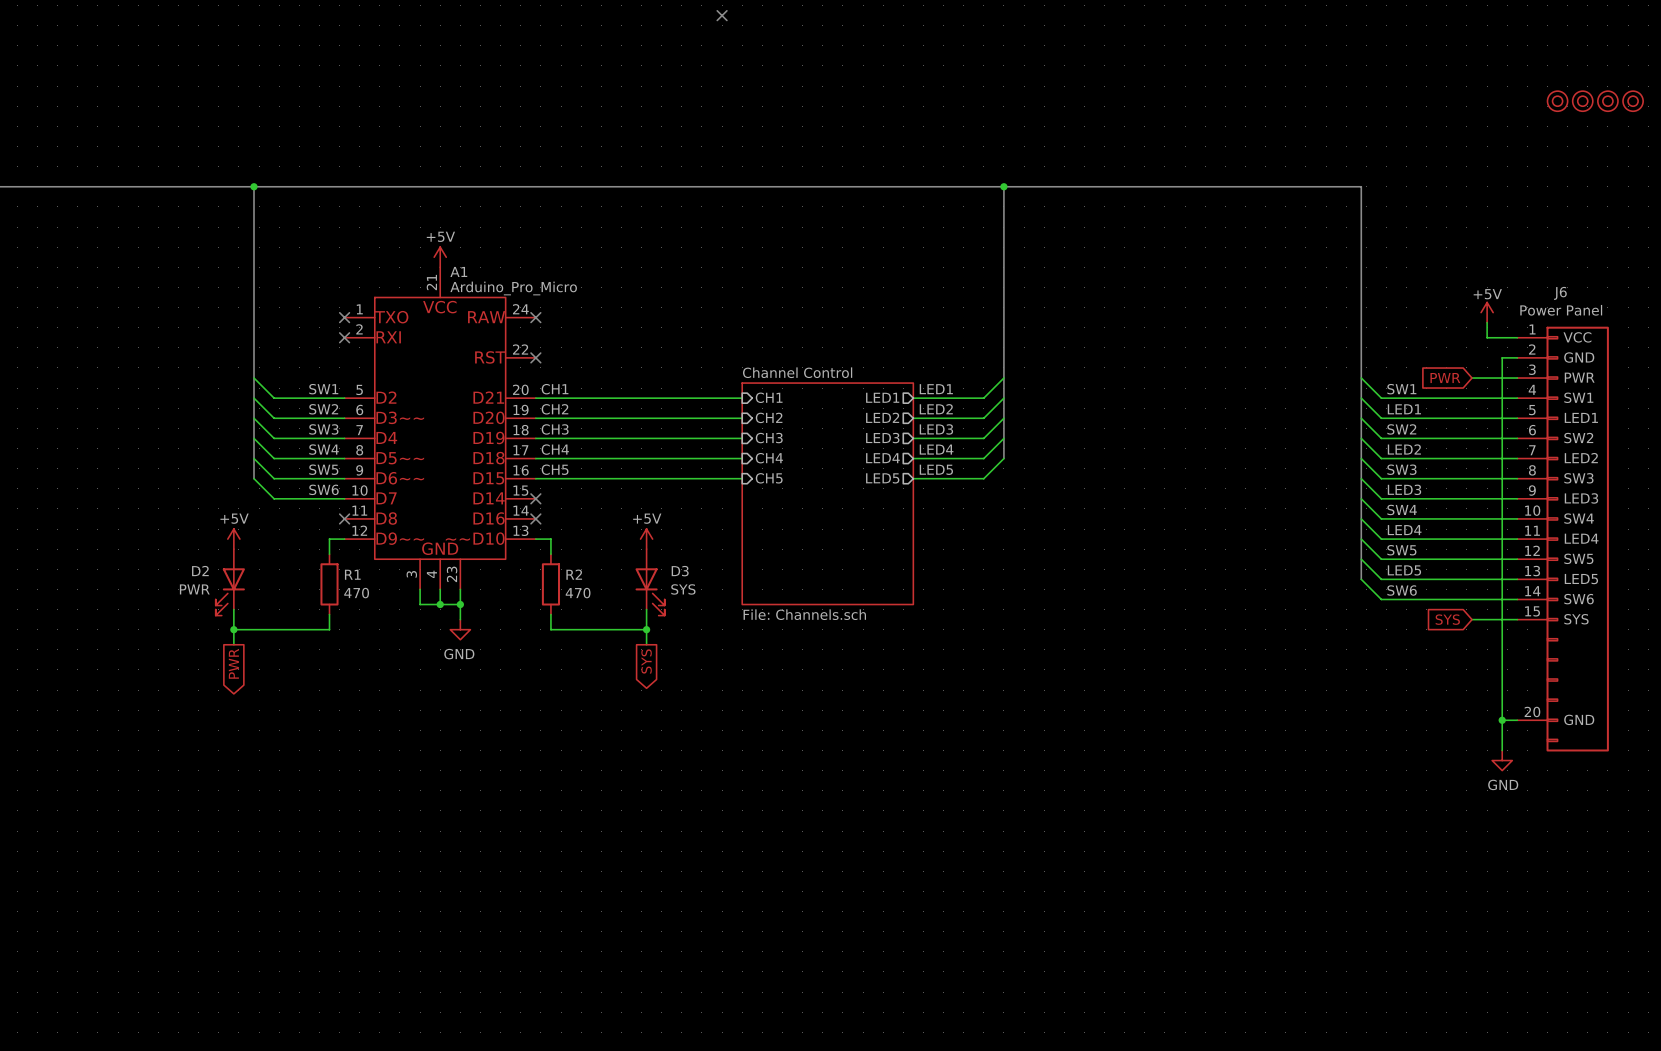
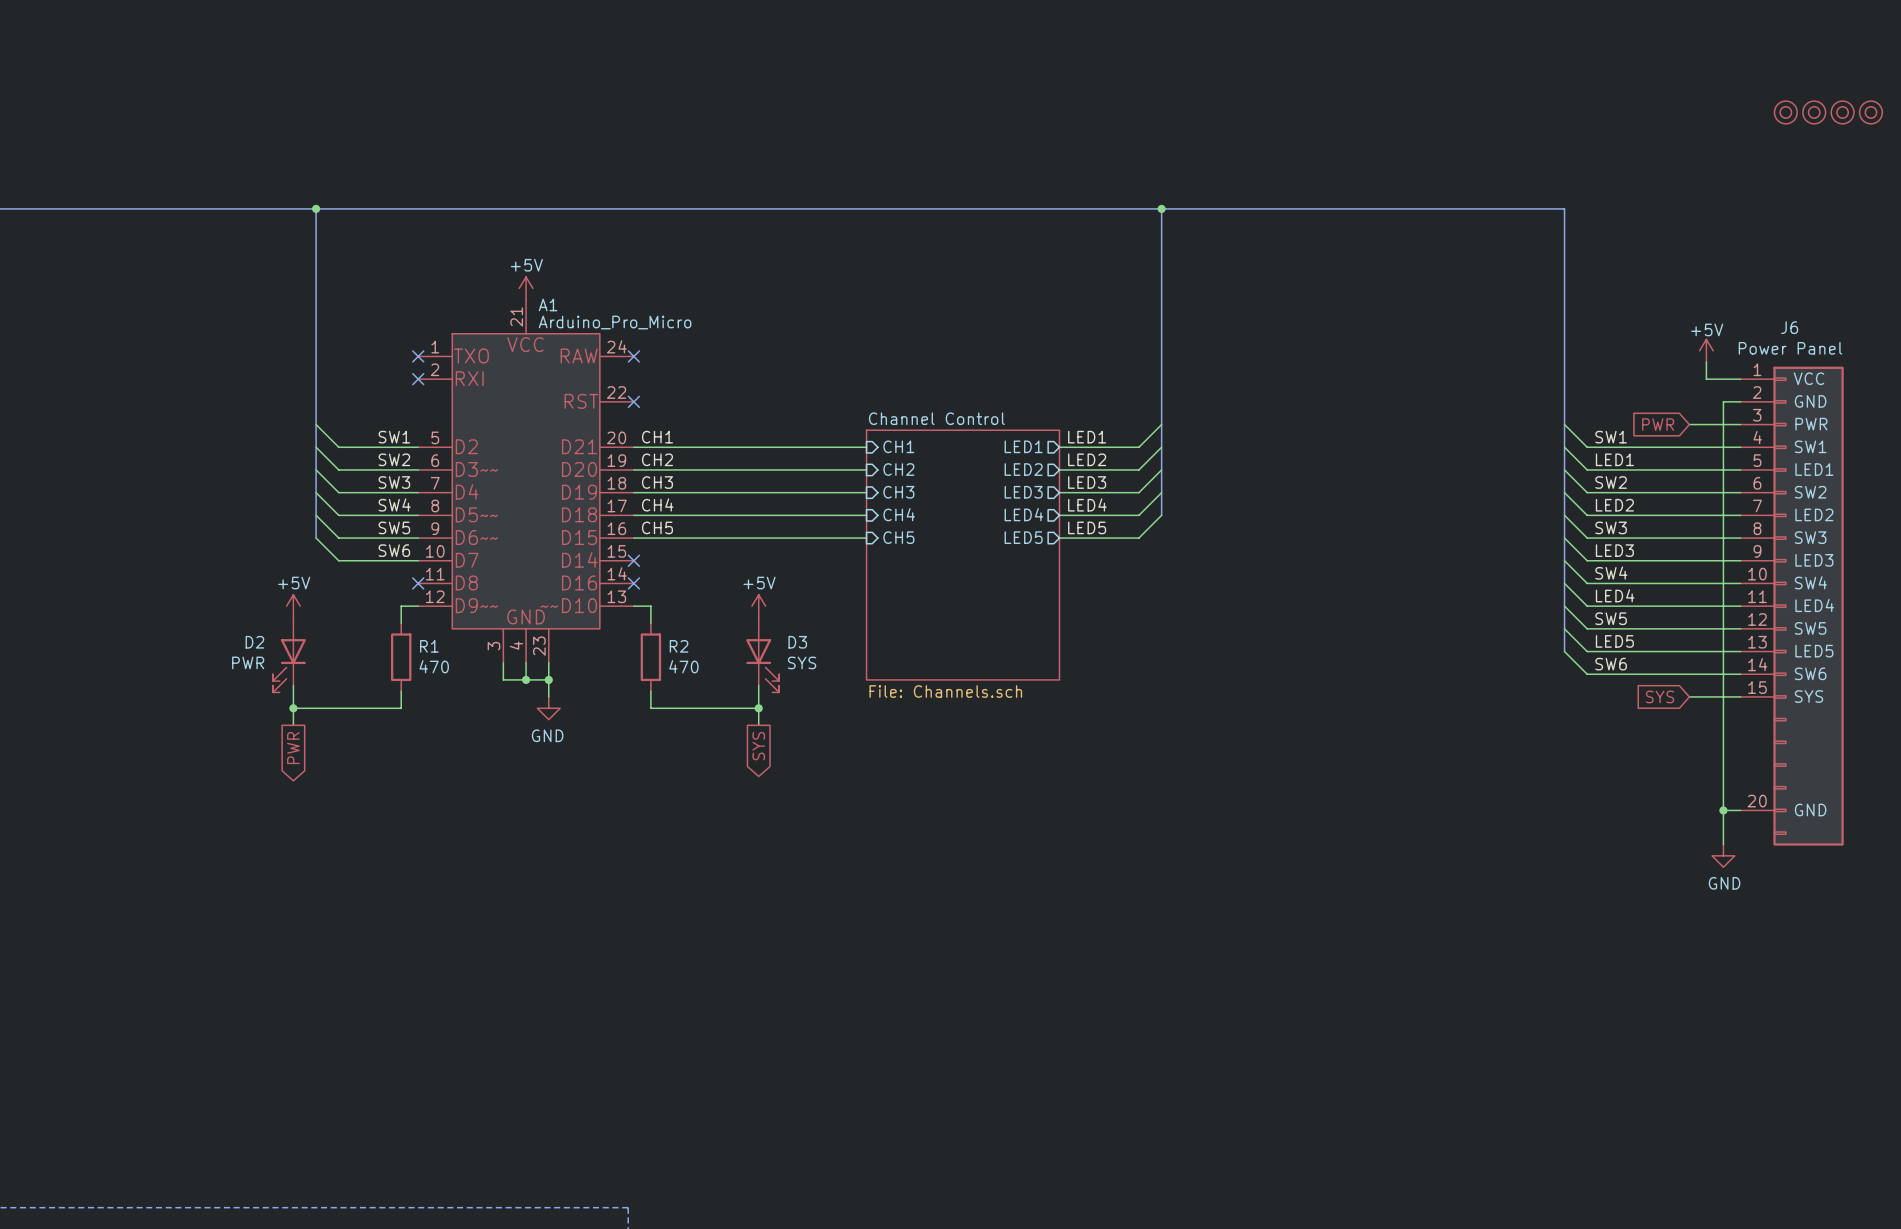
no-connect mark: (722, 15) -> none

